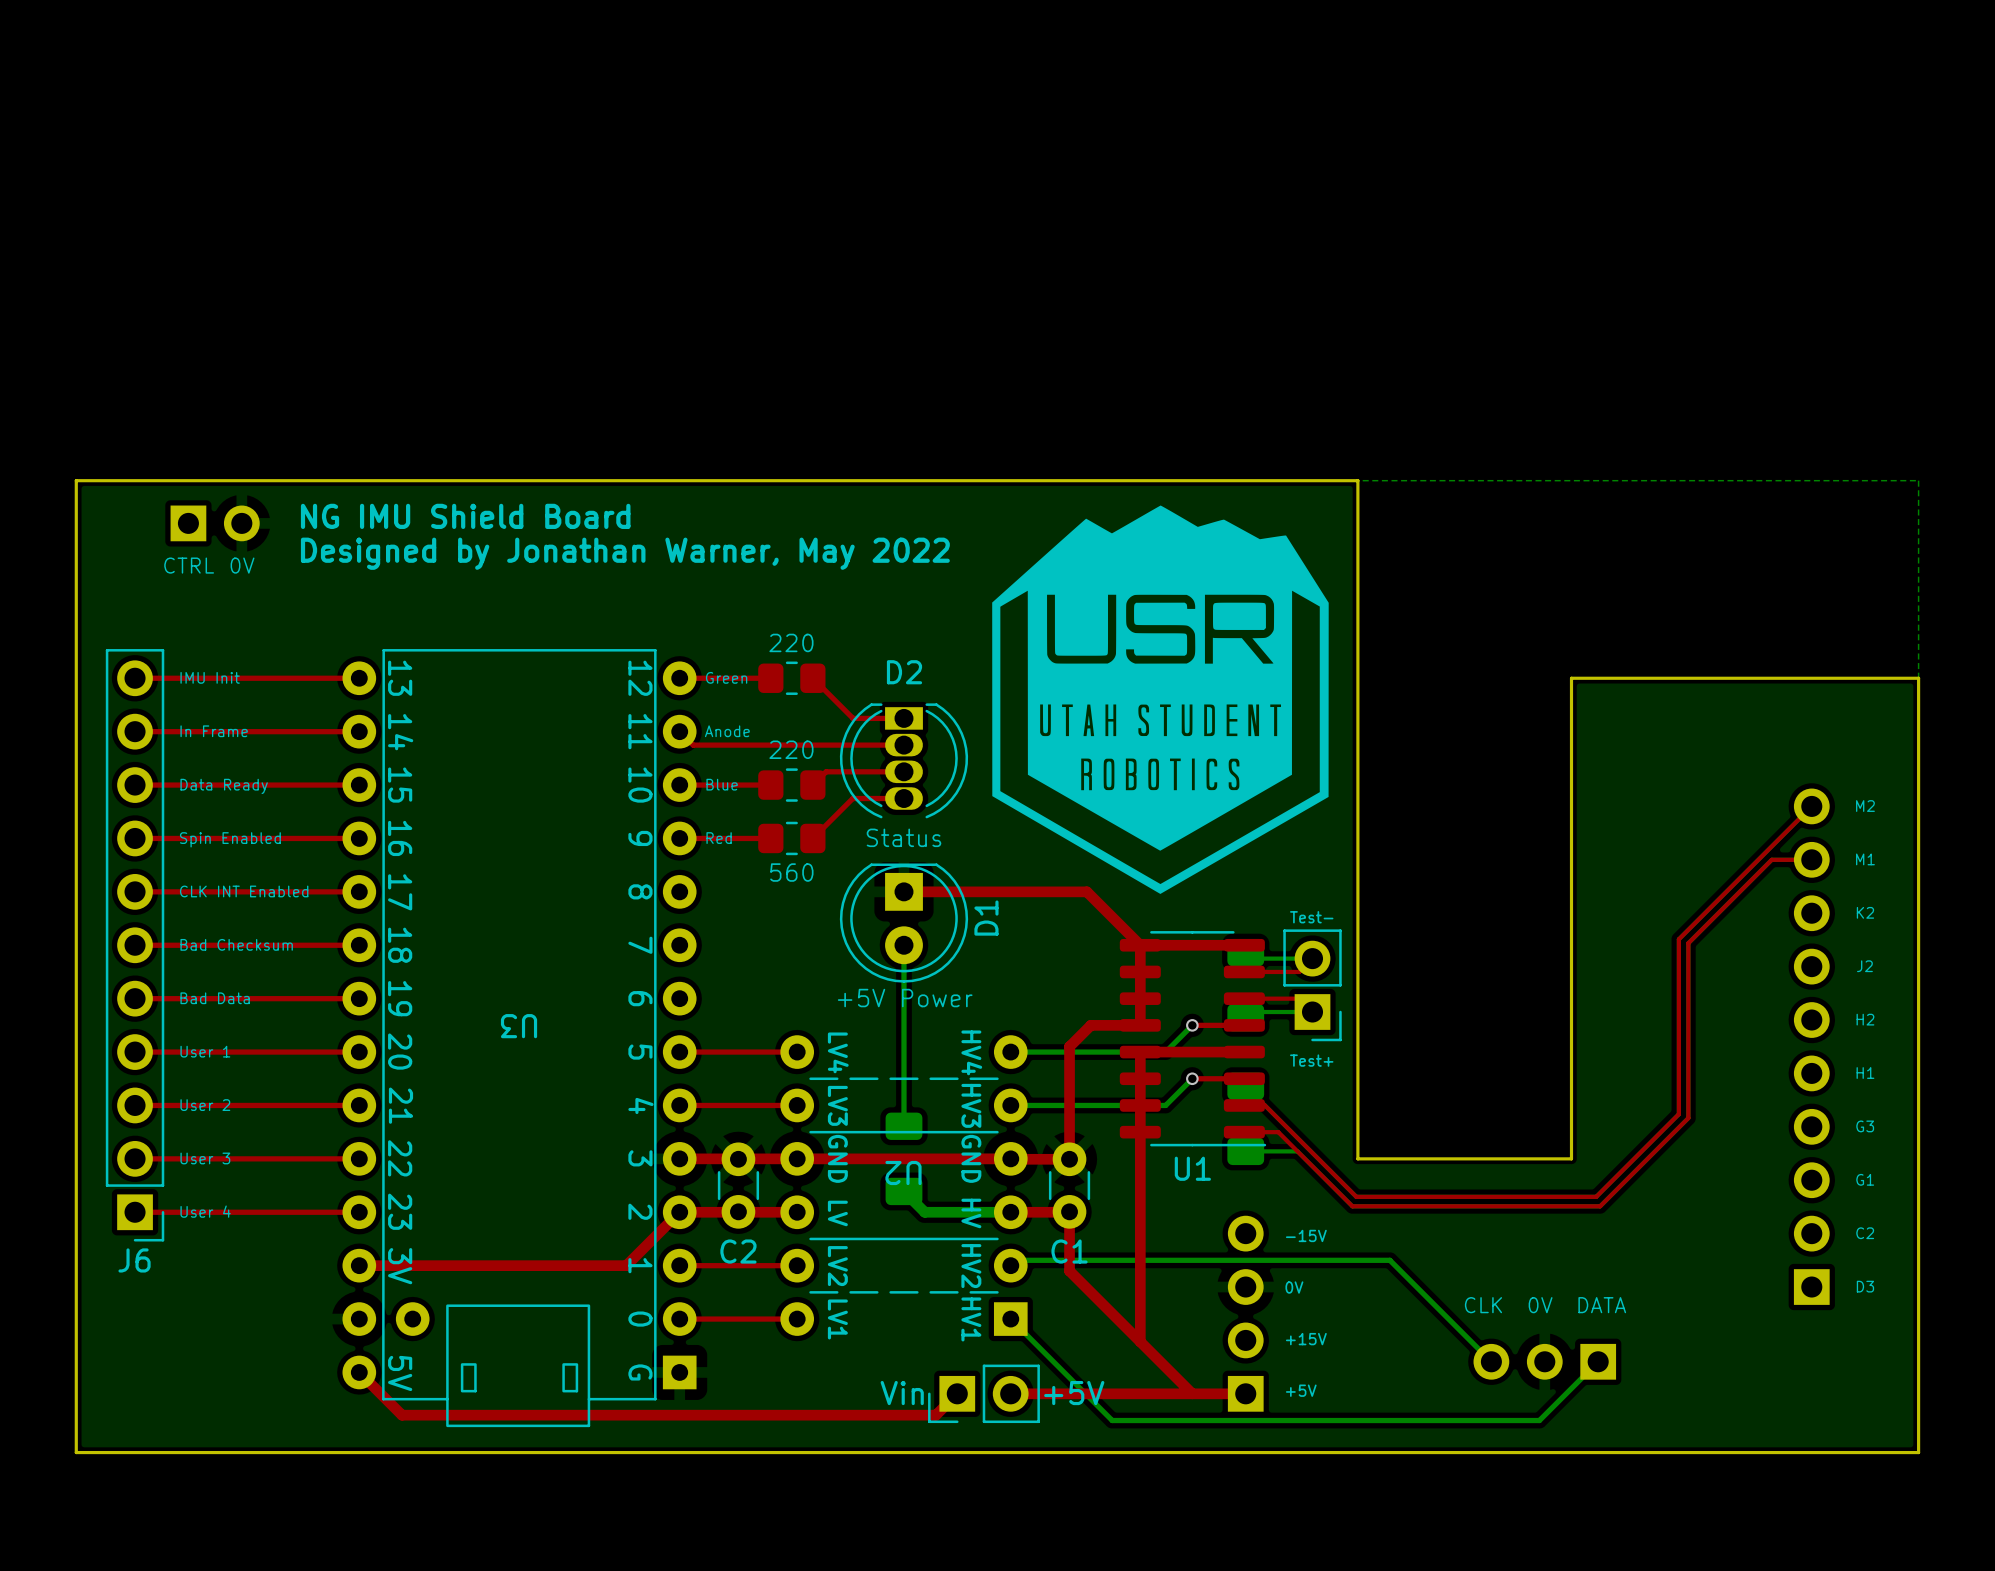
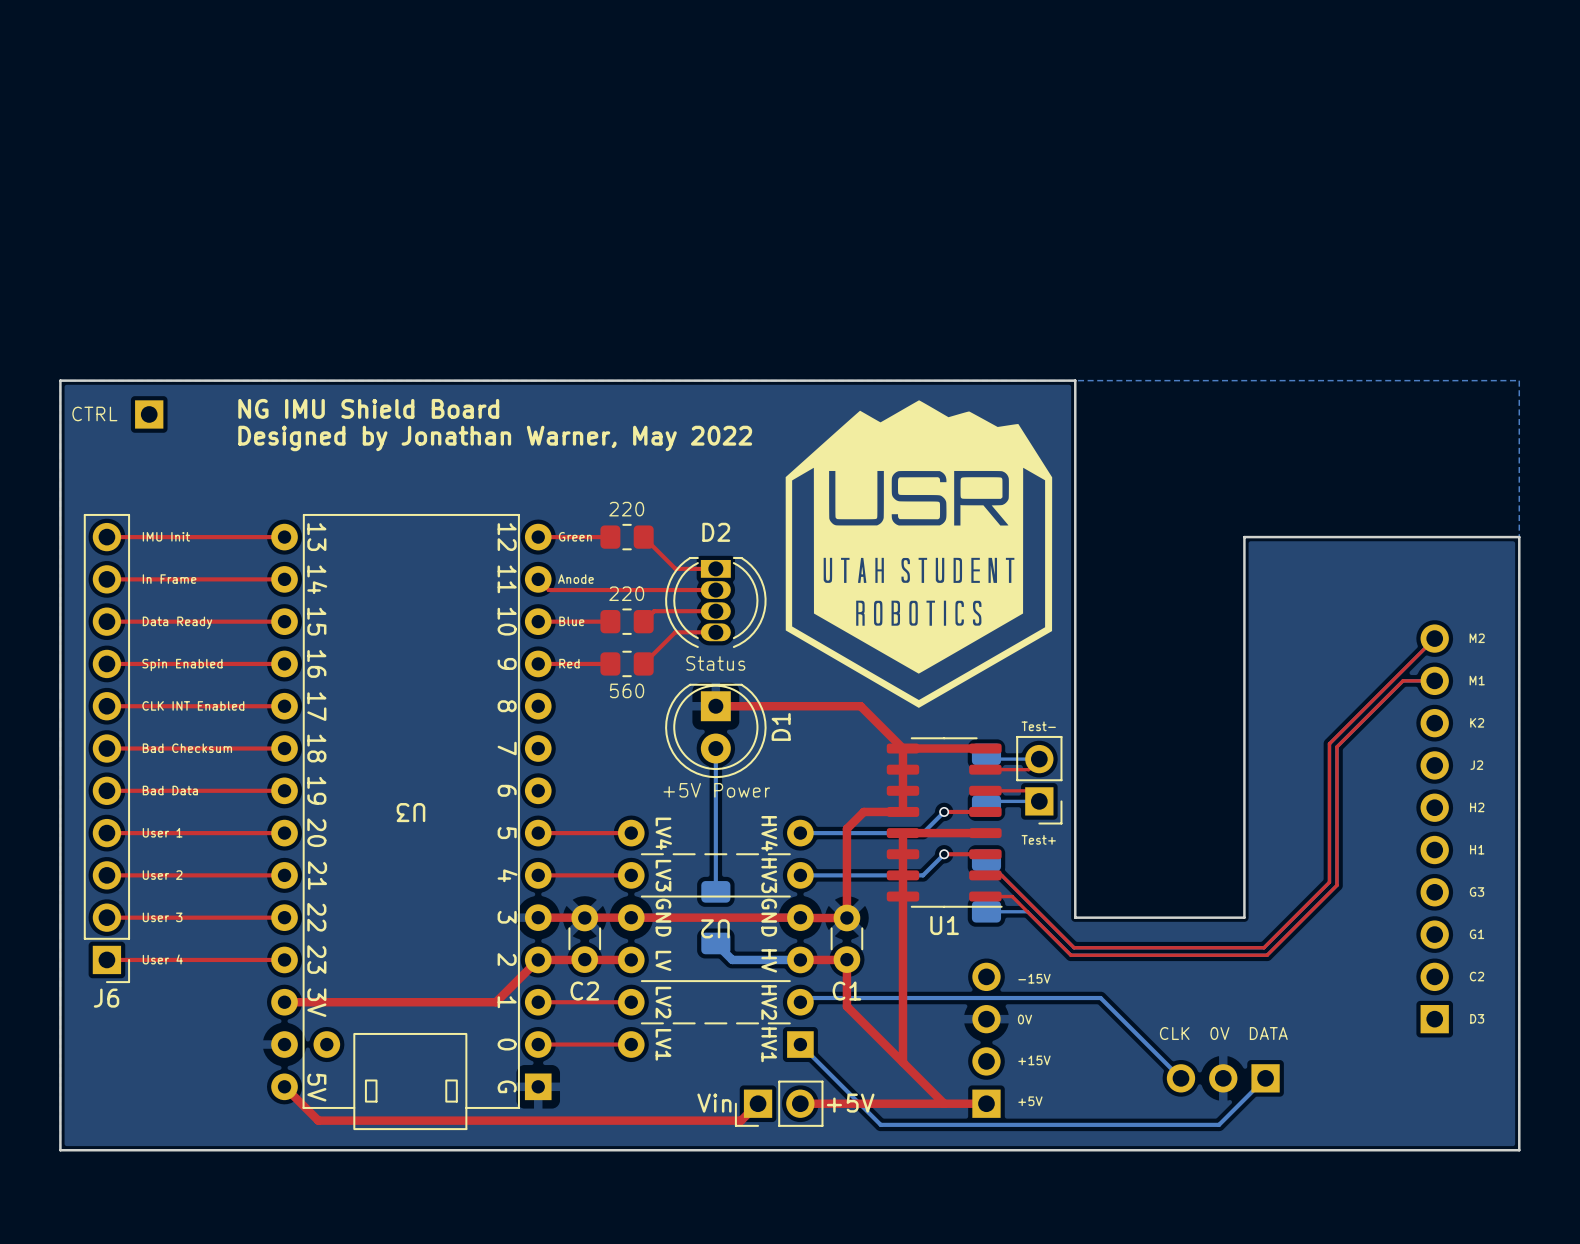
part: none -> (149, 414)
part: (215, 523) -> none

